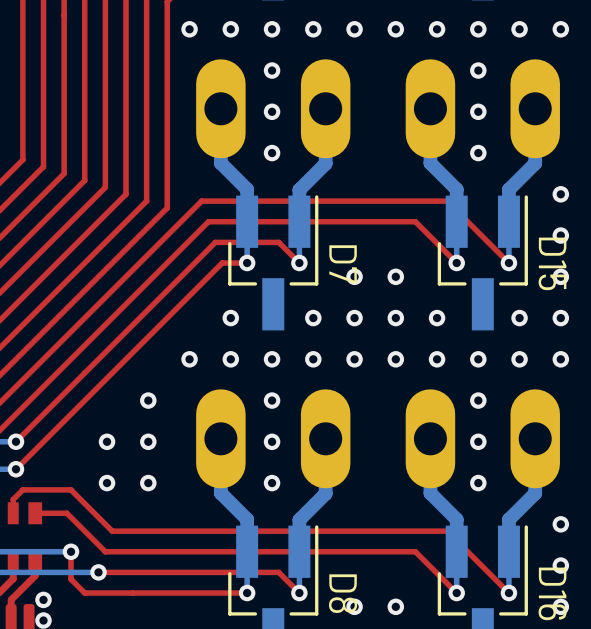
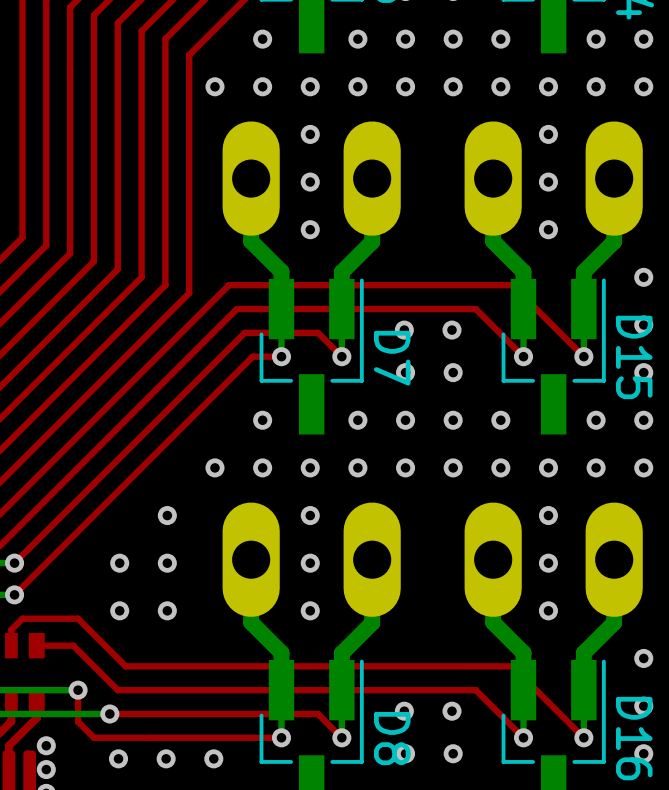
via: none -> (404, 330)
via: none -> (452, 330)
via: none -> (404, 711)
via: none -> (452, 711)
via: none -> (118, 758)
via: none -> (166, 758)
via: none -> (213, 758)

